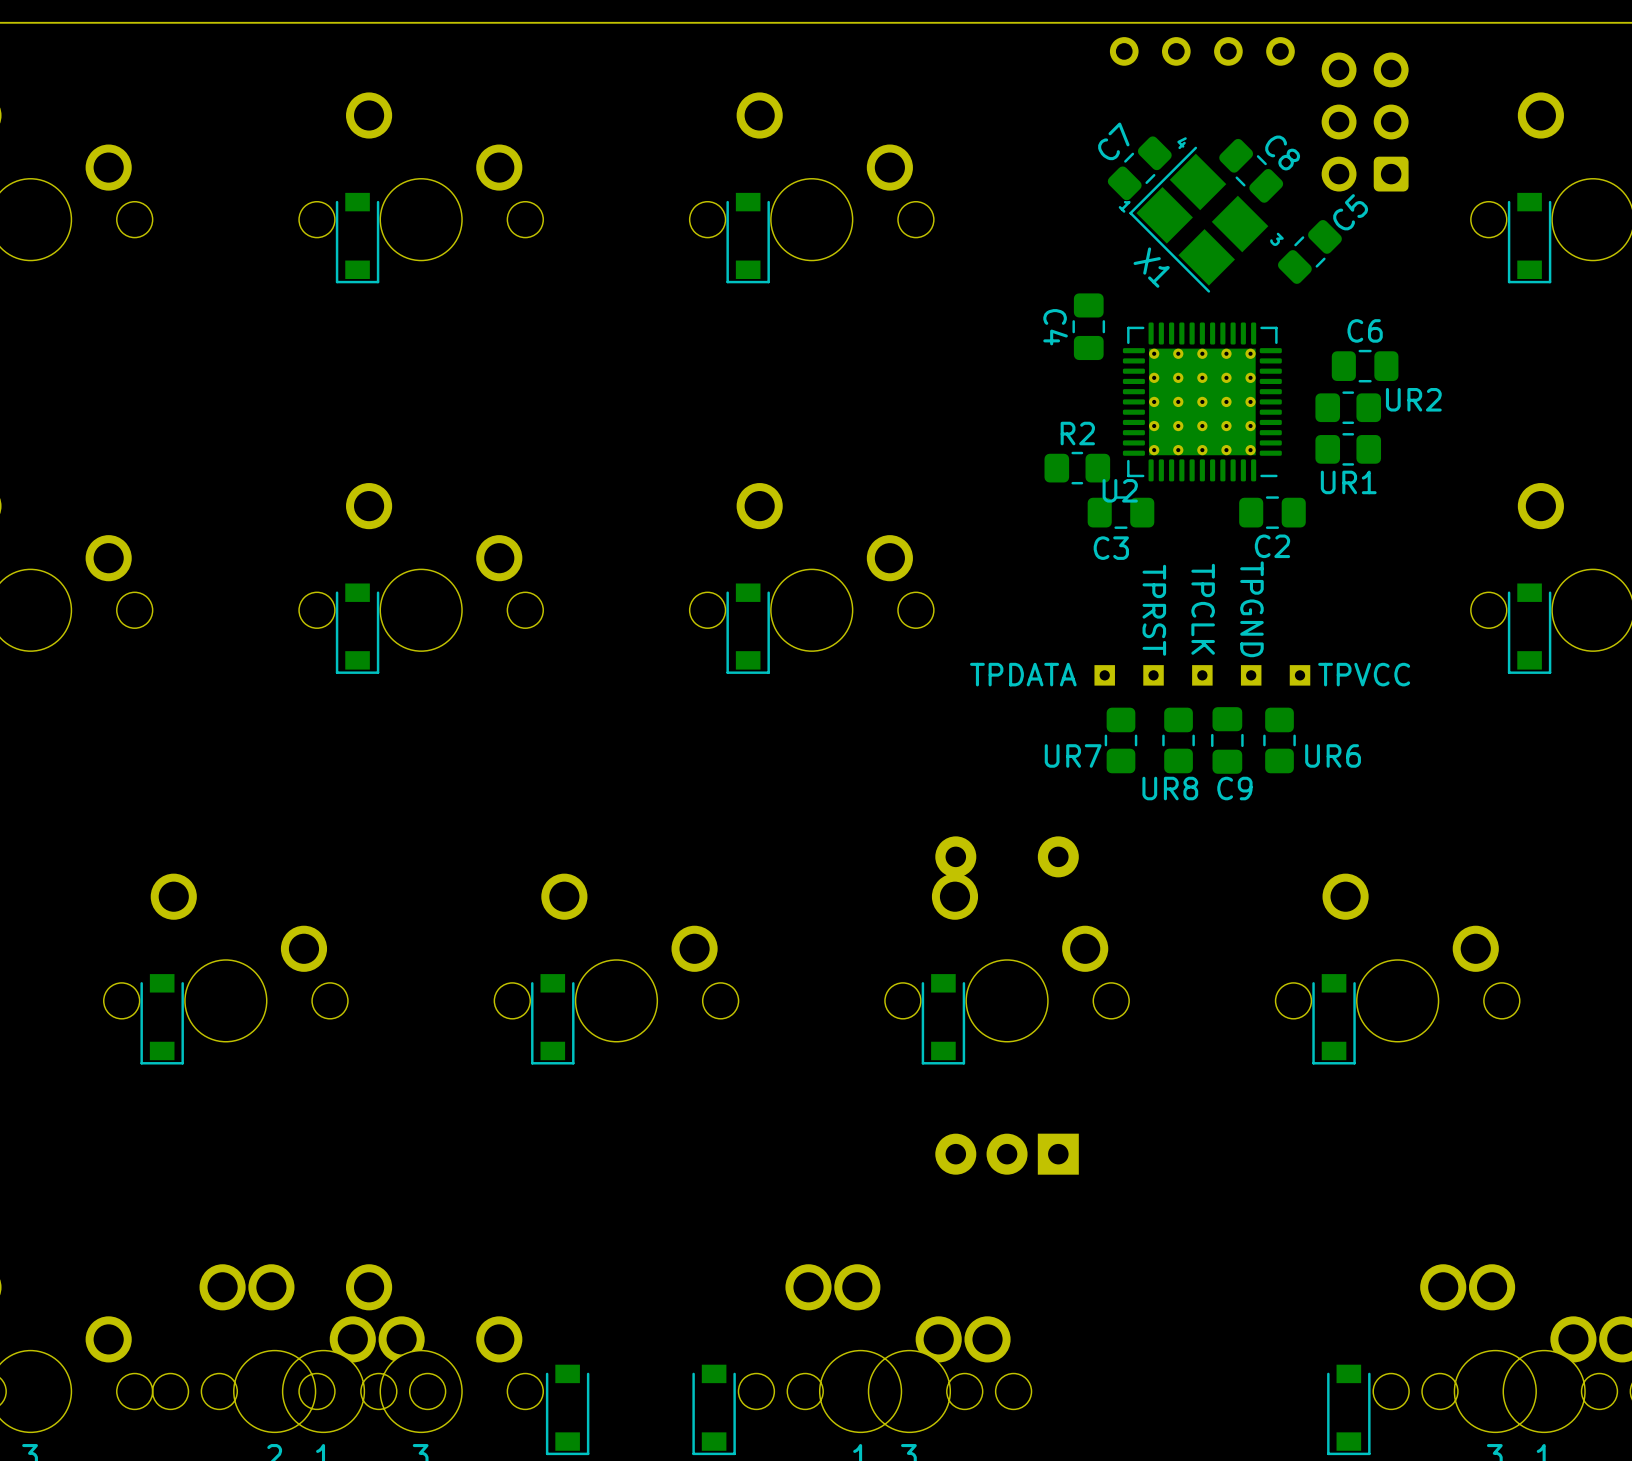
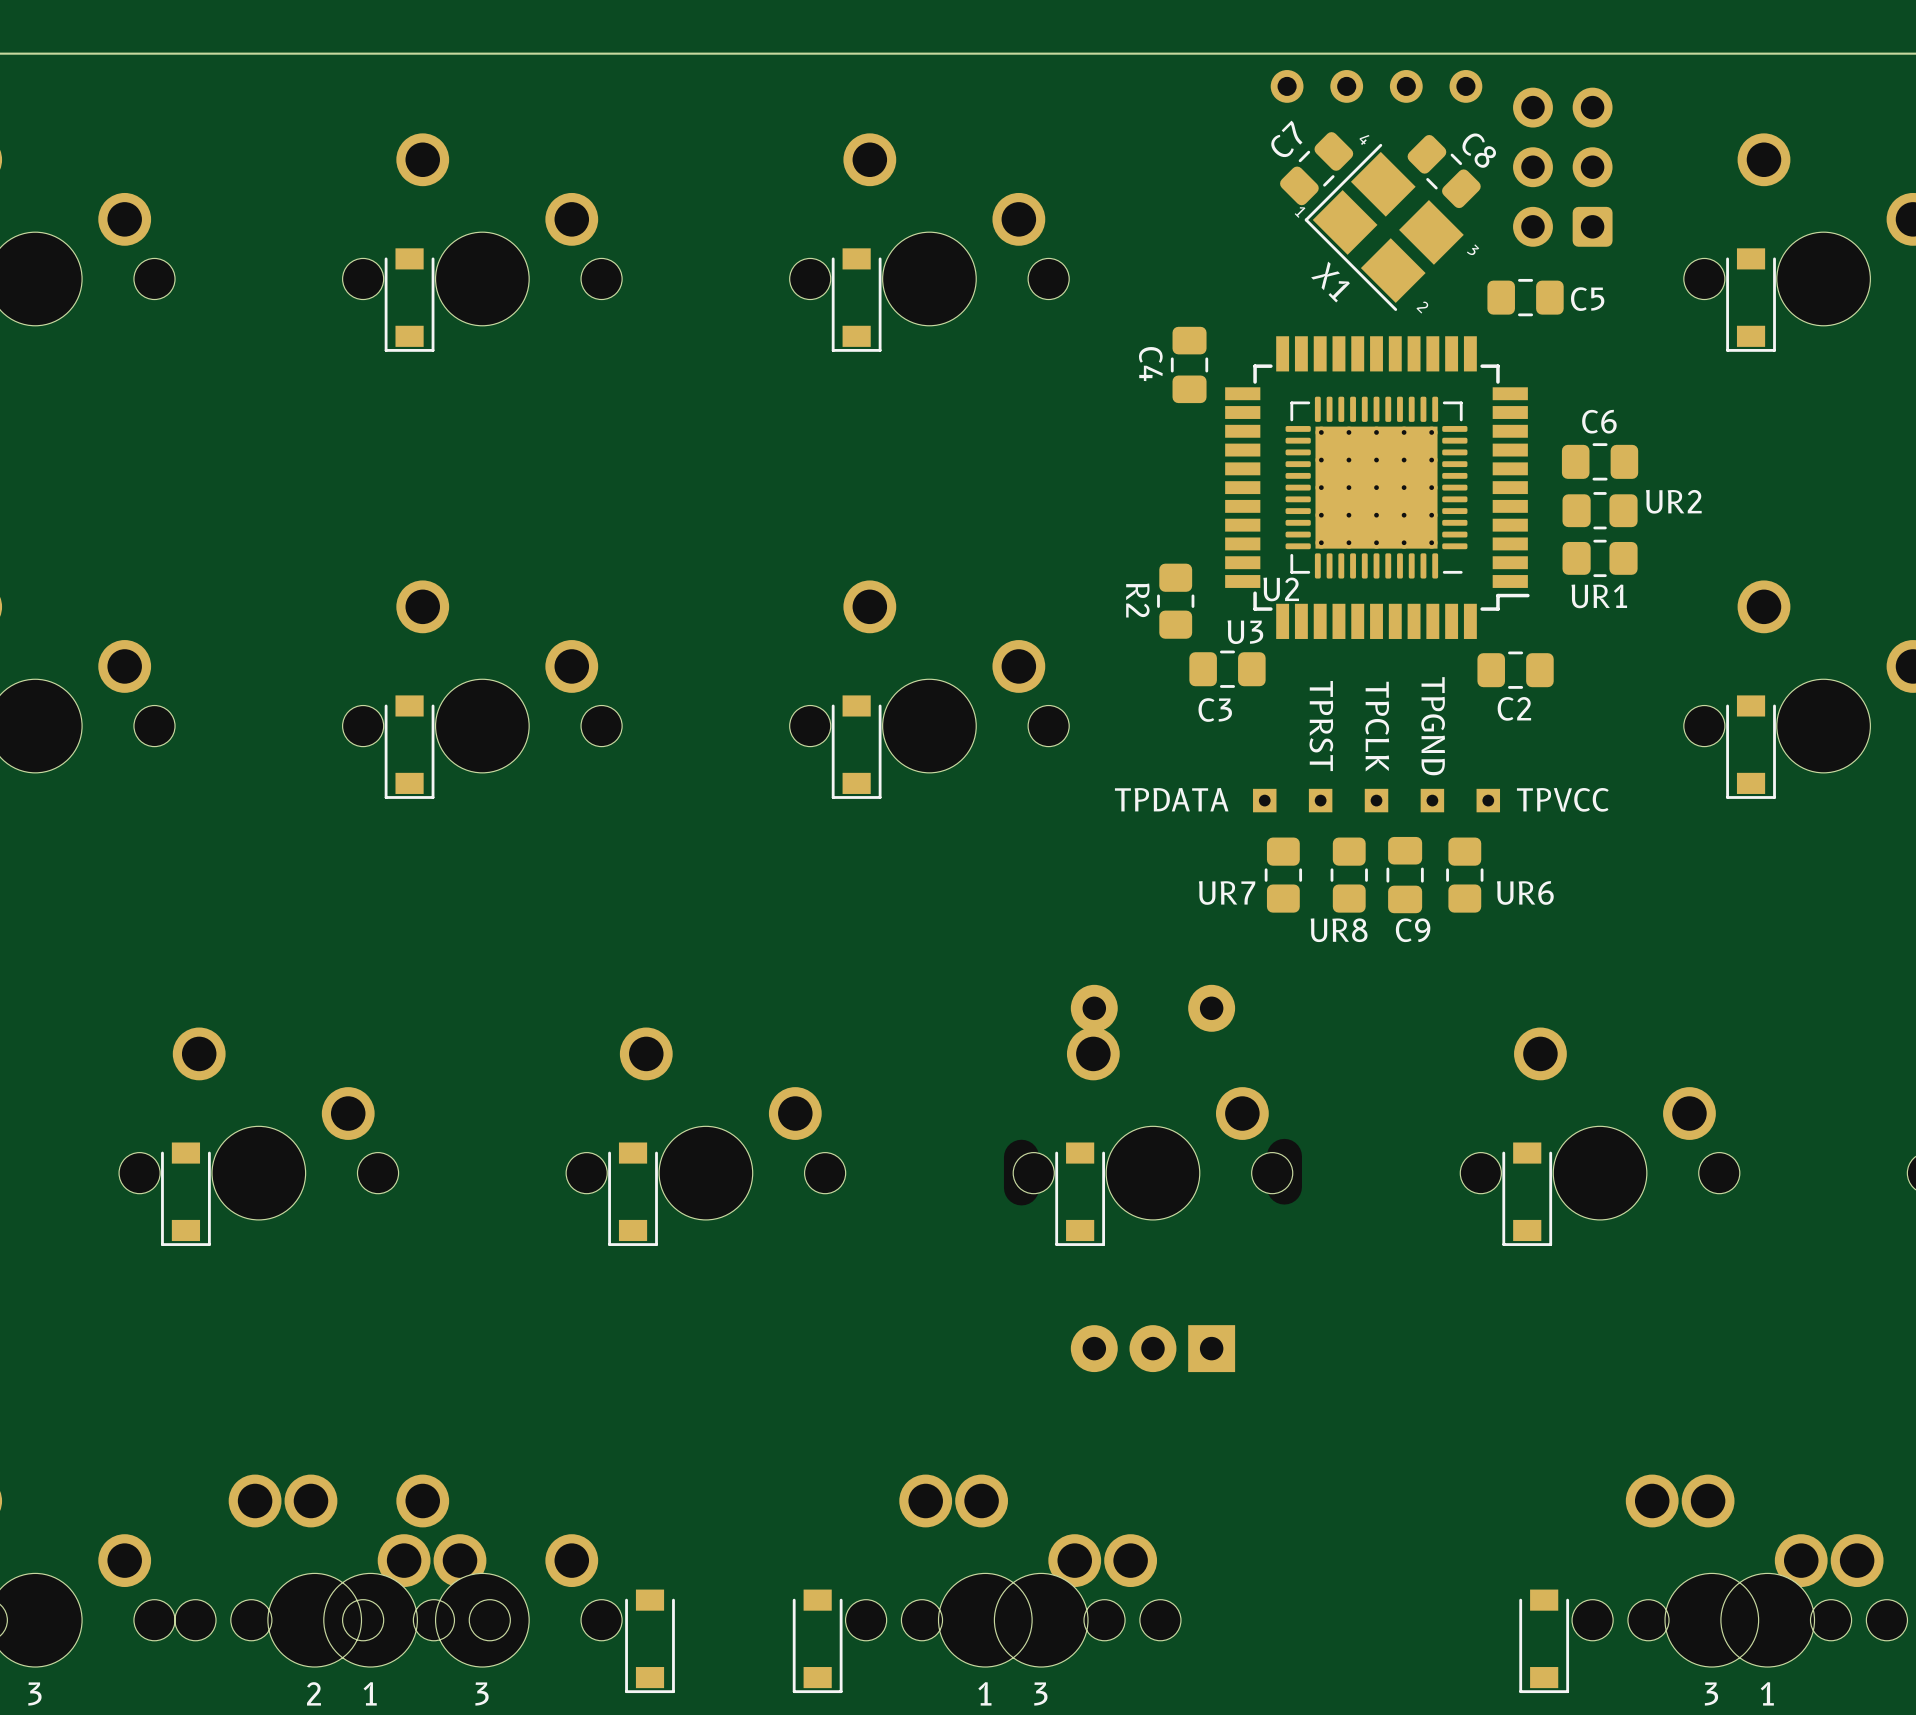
C7 position: (1139, 168) -> (1316, 168)
C8 position: (1251, 170) -> (1444, 171)
X1 position: (1198, 219) -> (1384, 227)
X1 text: none -> 2 (1422, 307)
C5 rotation: 0° (1309, 251) -> 45° clockwise (1525, 297)
C4 position: (1088, 326) -> (1189, 364)
C6 position: (1365, 366) -> (1600, 461)
U3: none -> (1377, 487)
UR2 position: (1348, 407) -> (1600, 510)
R2 name position: R2 (1077, 433) -> R2 (1137, 600)
UR1 position: (1348, 449) -> (1600, 558)
R2 rotation: 0° (1077, 468) -> 90° clockwise (1175, 601)
R2 position: (1077, 468) -> (1175, 601)
C3 position: (1120, 512) -> (1227, 669)
C2 position: (1272, 512) -> (1515, 670)

